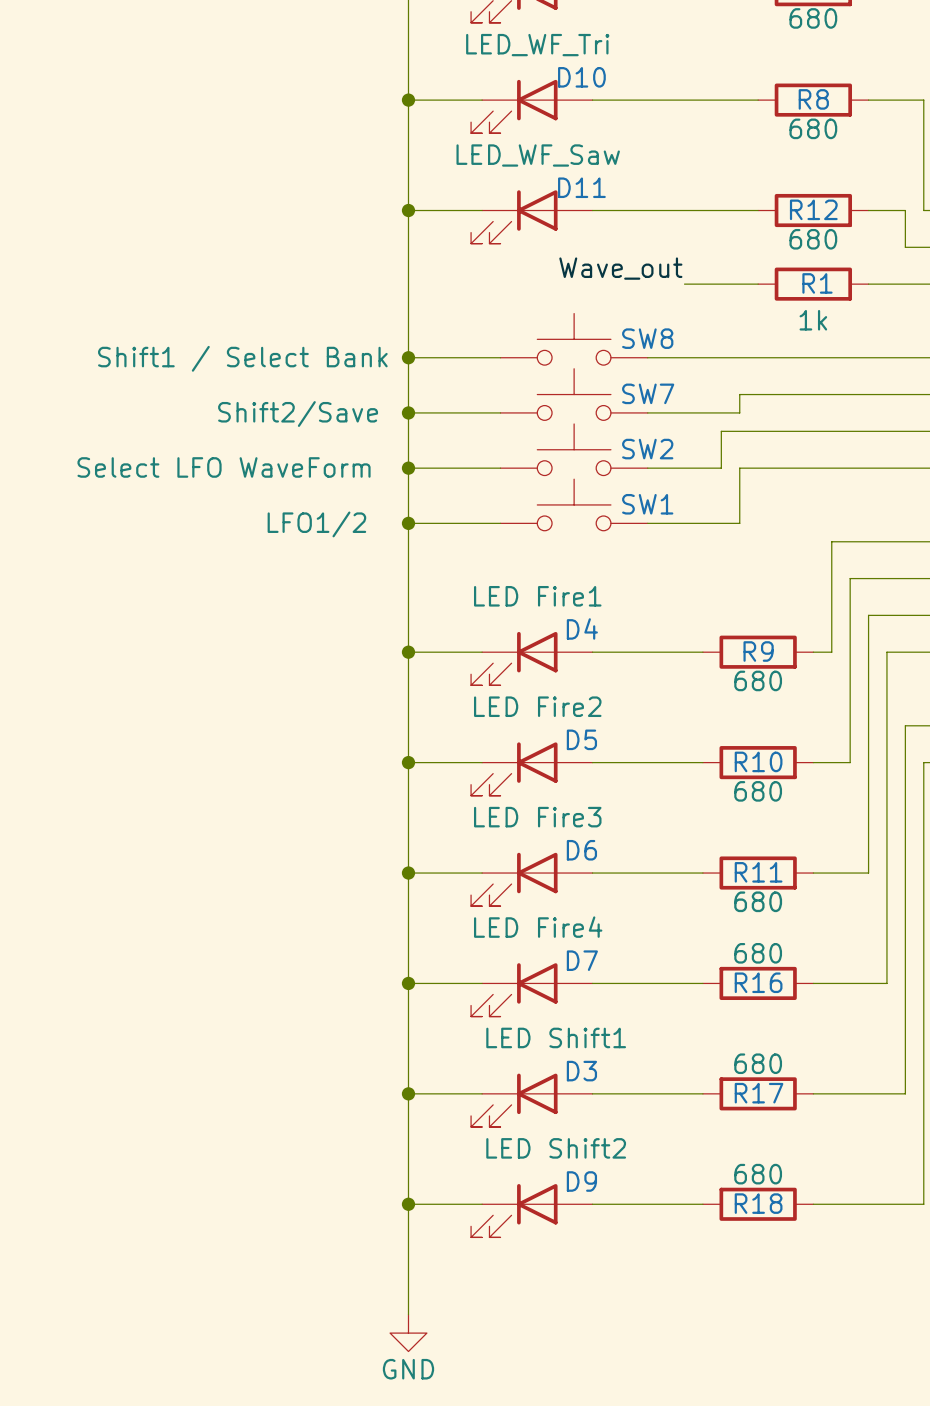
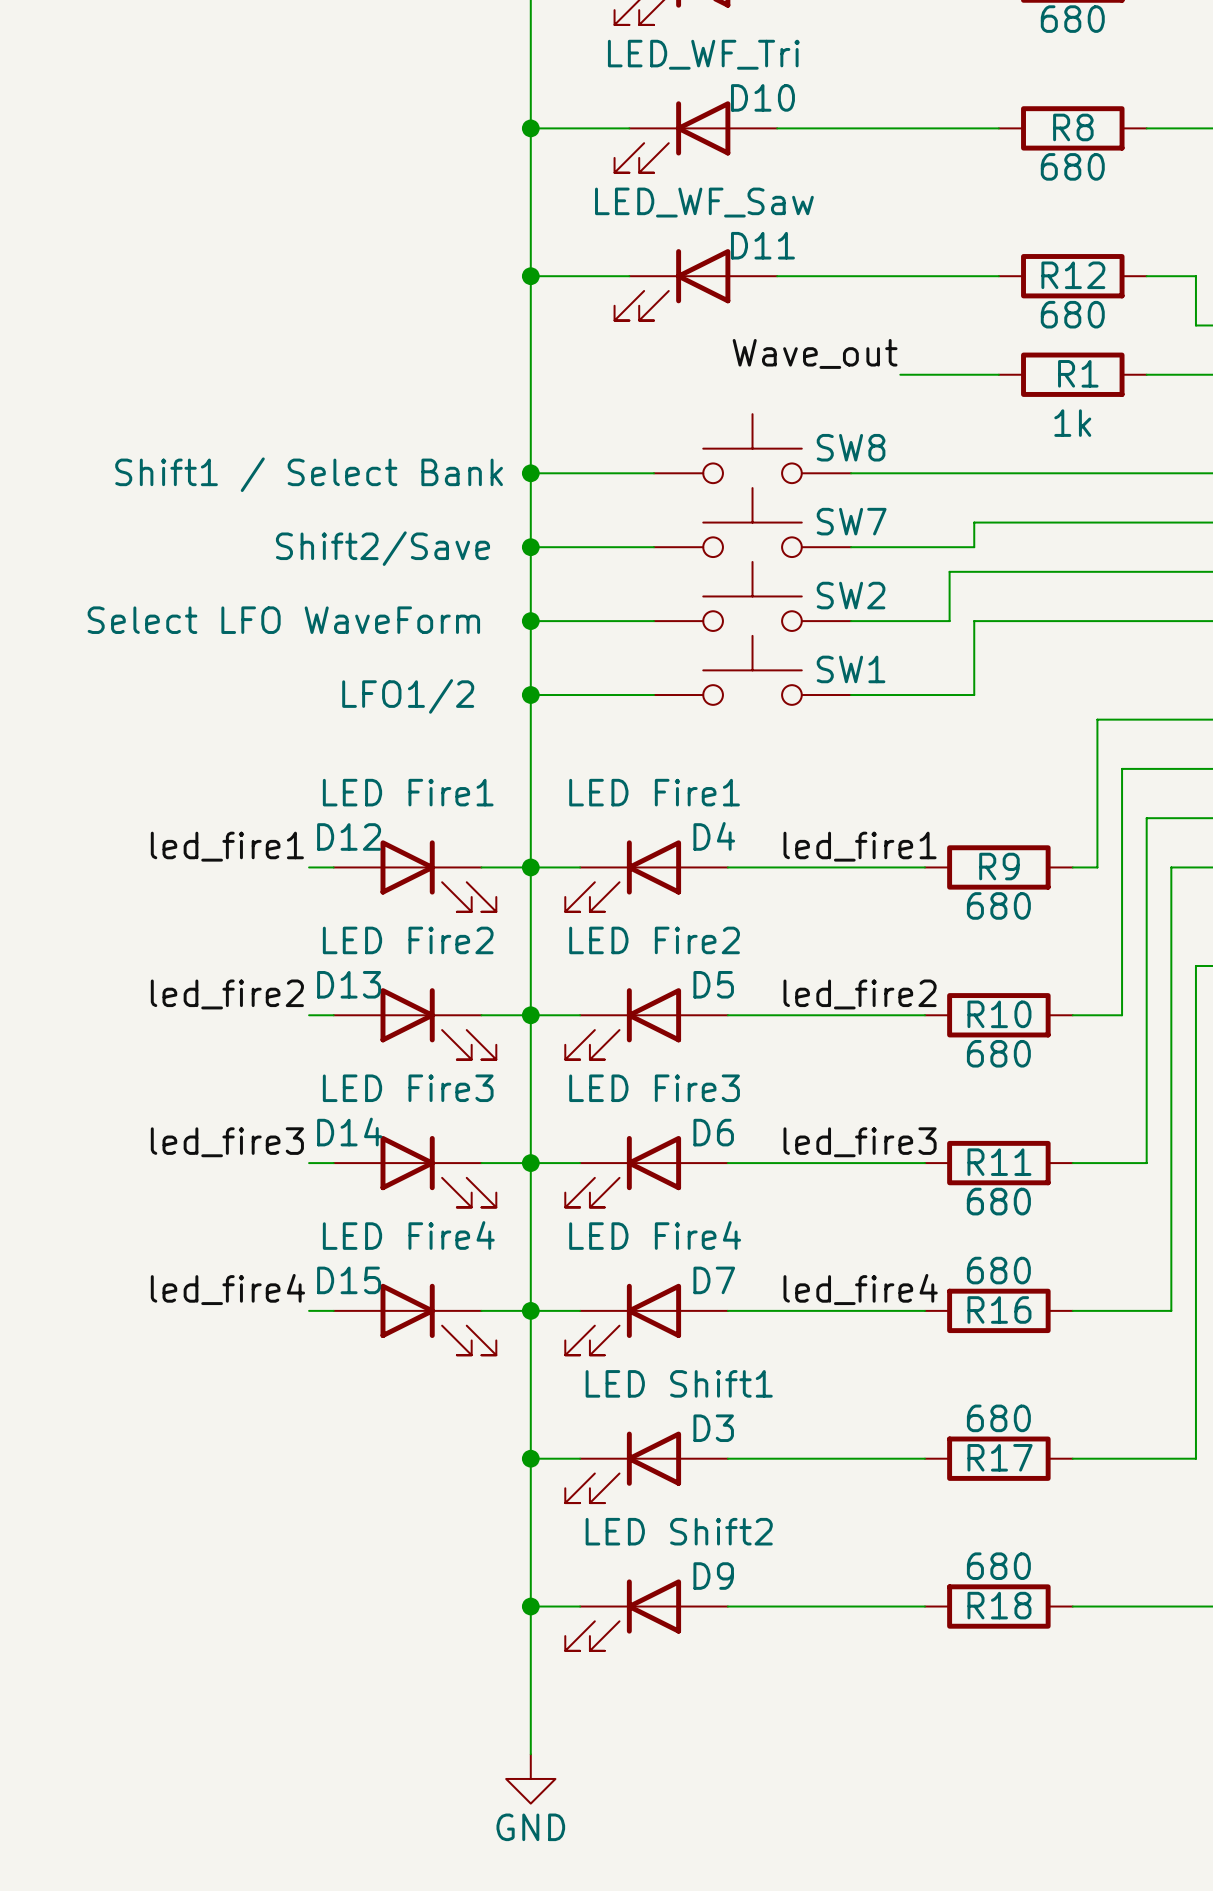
label: none -> led_fire1 (227, 846)
label: none -> led_fire1 (860, 846)
wire: none -> (309, 867) (333, 867)
wire: none -> (481, 867) (530, 867)
D12: none -> LED Fire1 (415, 876)
D4 position: (531, 658) -> (646, 876)
label: none -> led_fire2 (227, 994)
label: none -> led_fire2 (860, 994)
wire: none -> (309, 1015) (333, 1015)
wire: none -> (481, 1015) (530, 1015)
D13: none -> LED Fire2 (415, 1023)
D5 position: (531, 769) -> (646, 1023)
label: none -> led_fire3 (227, 1142)
label: none -> led_fire3 (860, 1142)
wire: none -> (309, 1163) (333, 1163)
wire: none -> (481, 1163) (530, 1163)
D14: none -> LED Fire3 (415, 1171)
D6 position: (531, 879) -> (646, 1171)
label: none -> led_fire4 (227, 1289)
label: none -> led_fire4 (860, 1289)
wire: none -> (309, 1310) (333, 1310)
wire: none -> (481, 1310) (530, 1310)
D15: none -> LED Fire4 (415, 1319)
D7 position: (531, 989) -> (646, 1319)
D3 position: (531, 1100) -> (646, 1467)
D9 position: (531, 1210) -> (646, 1615)

